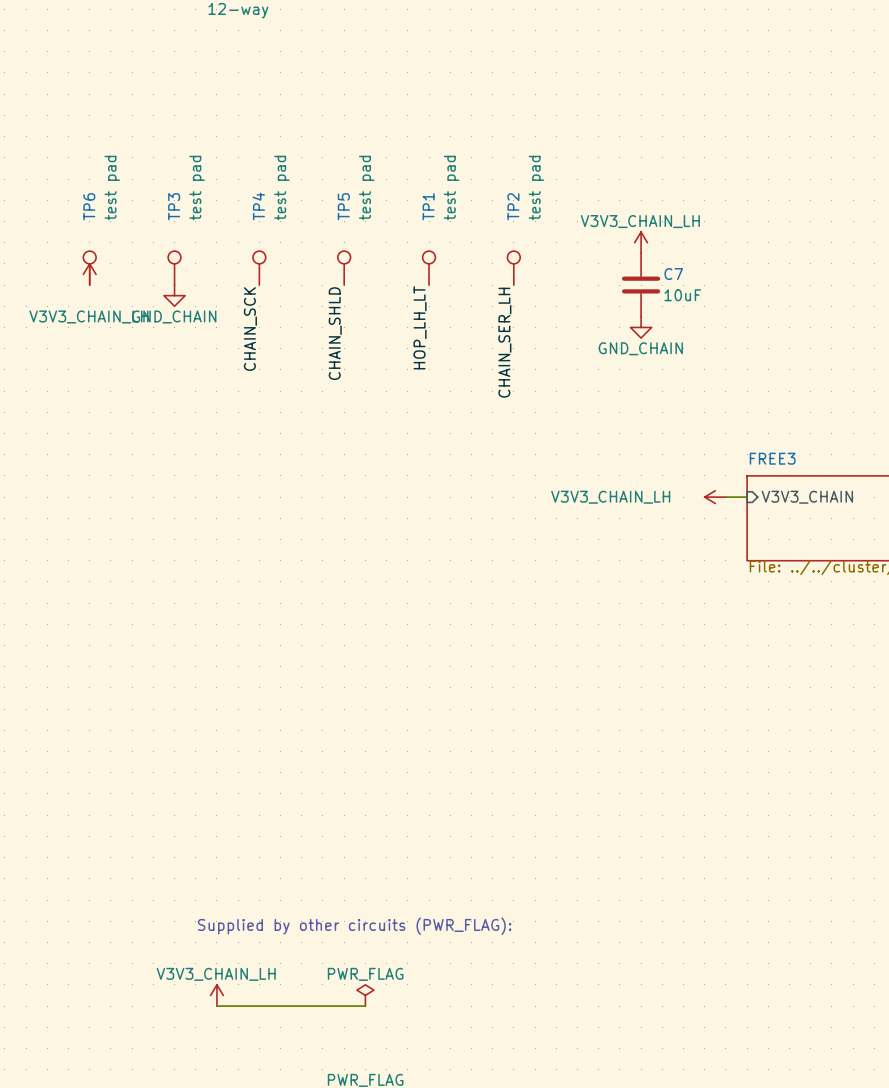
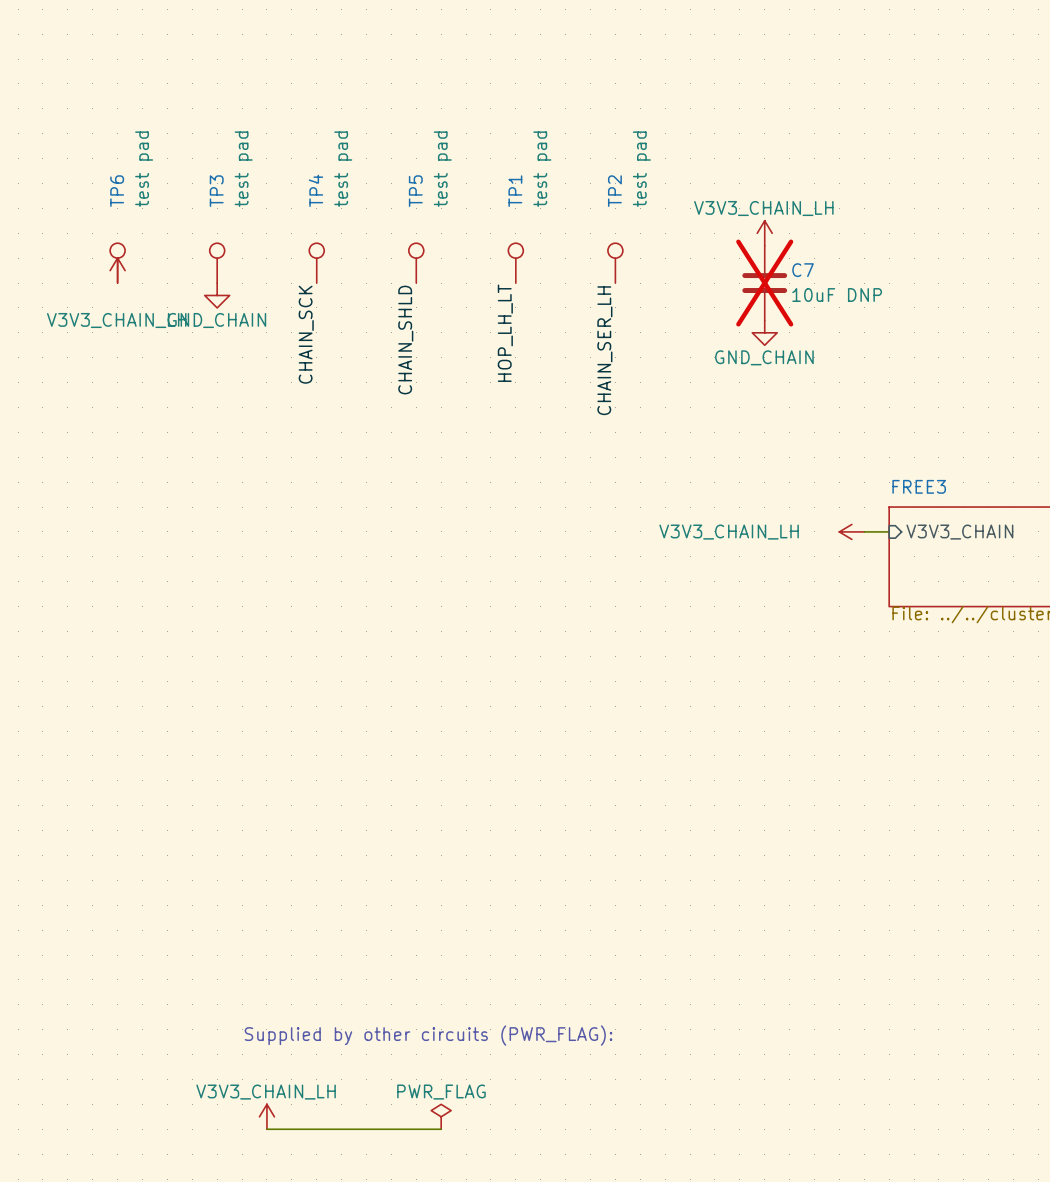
C7 do-not-place cross: none -> (764, 283)
C7 value: 10uF (682, 295) -> 10uF DNP (837, 295)

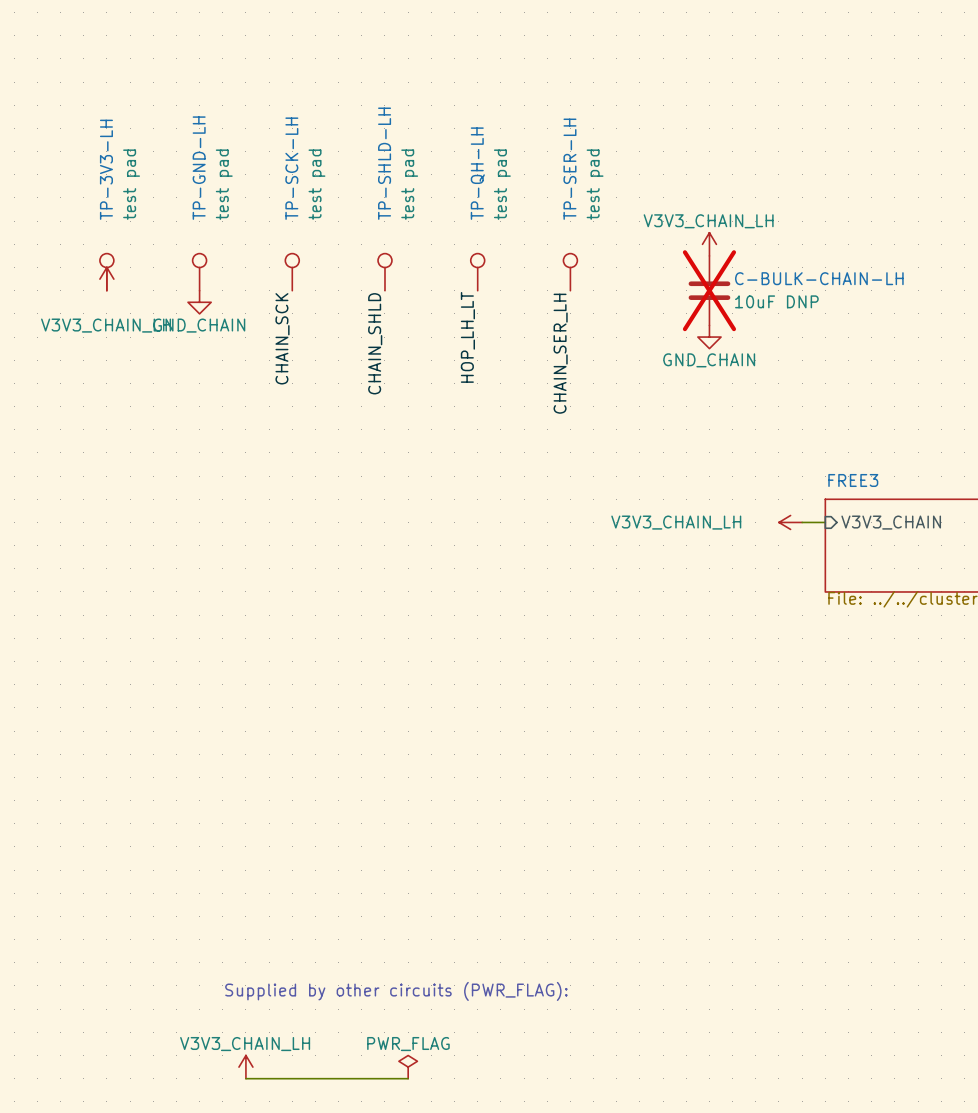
TP4 name: TP4 (315, 190) -> TP-SCK-LH (291, 168)
TP6 name: TP6 (117, 191) -> TP-3V3-LH (106, 169)
TP3 name: TP3 (216, 191) -> TP-GND-LH (199, 168)
TP5 name: TP5 (415, 191) -> TP-SHLD-LH (384, 163)
TP1 name: TP1 (515, 191) -> TP-QH-LH (477, 173)
TP2 name: TP2 (614, 191) -> TP-SER-LH (569, 169)
C7 name: C7 (803, 270) -> C-BULK-CHAIN-LH (819, 278)

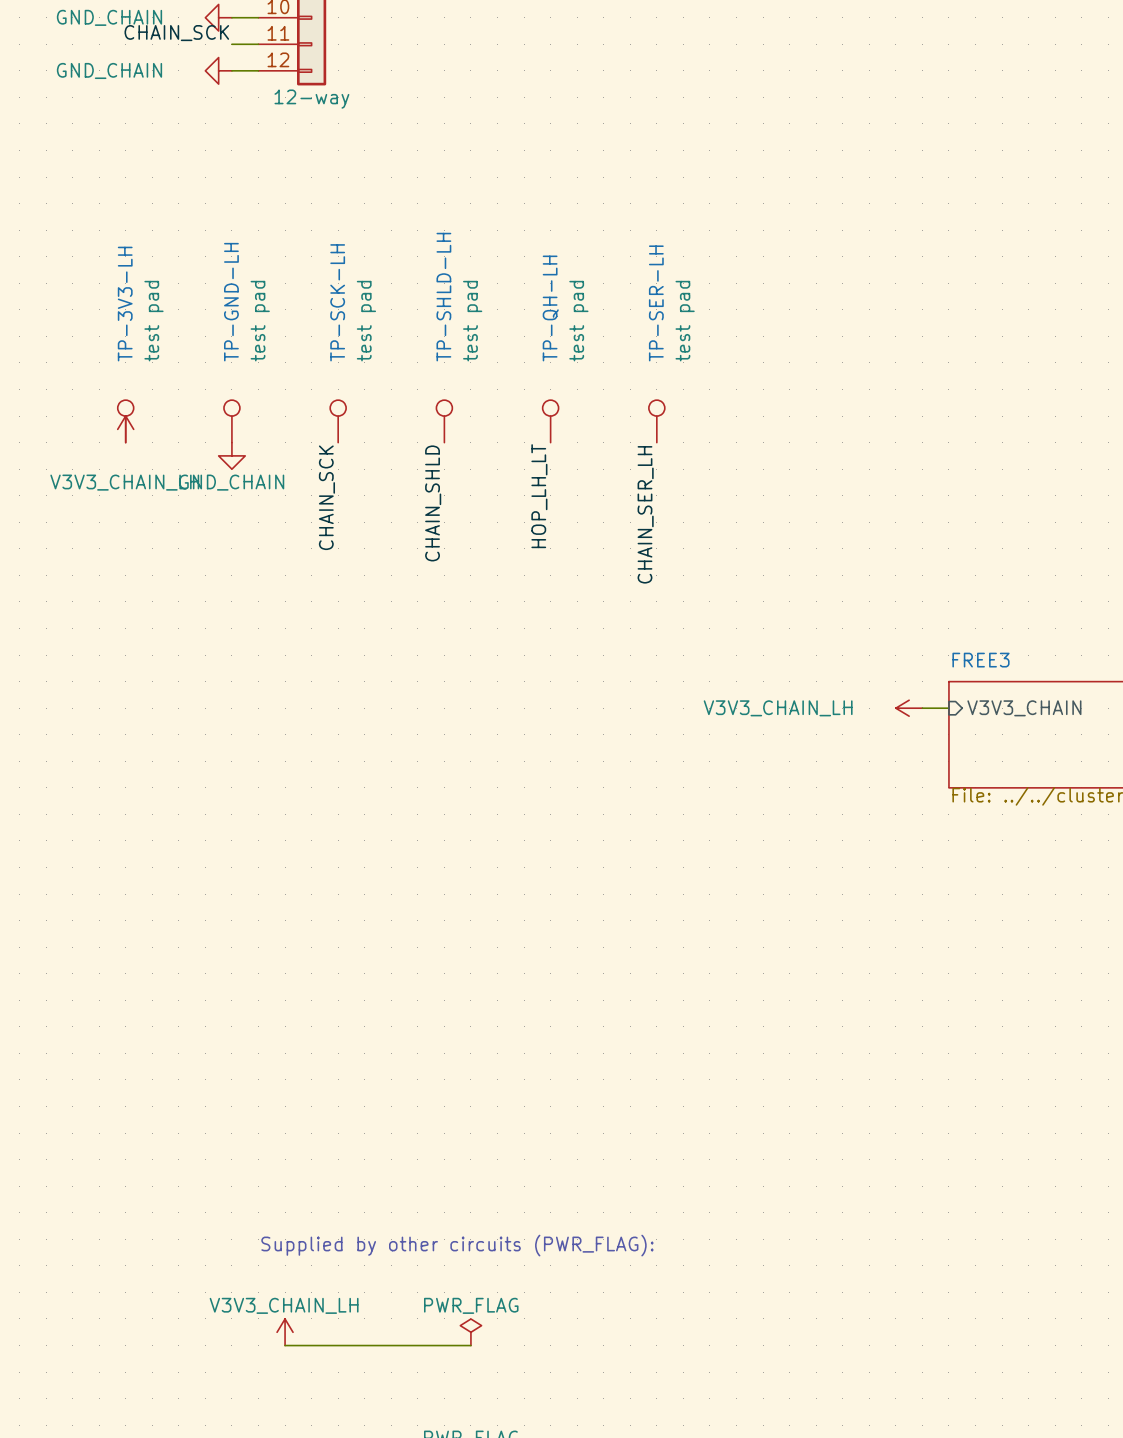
power symbol: V3V3_CHAIN_LH (709, 244) -> none
C-BULK-CHAIN-LH: 10uF DNP (709, 290) -> none
power symbol: GND_CHAIN (709, 337) -> none

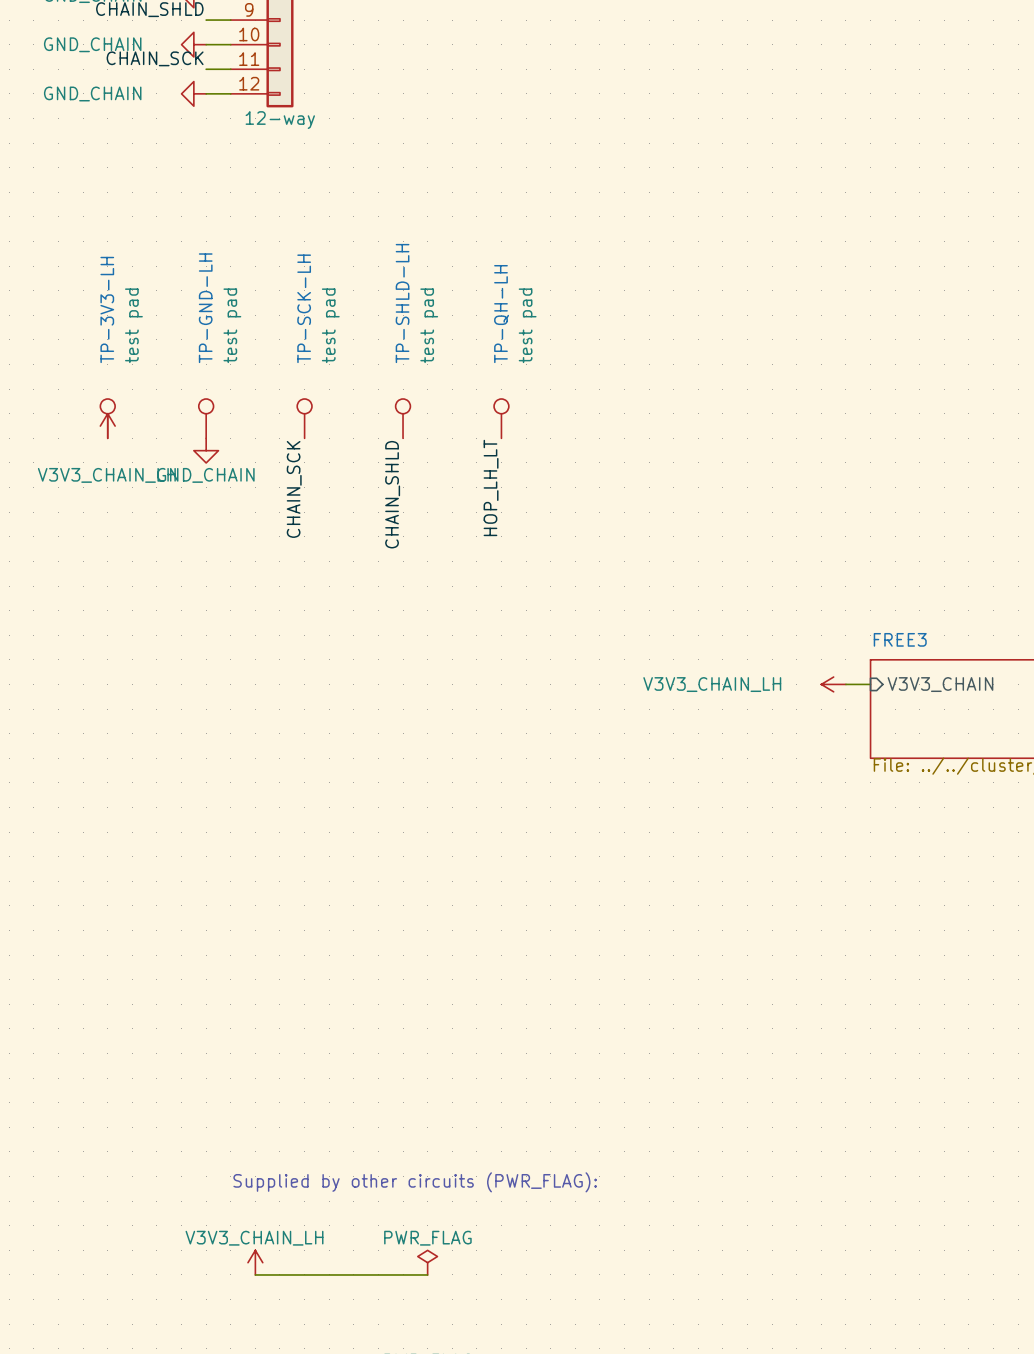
TP-SER-LH: test pad (656, 421) -> none
label: CHAIN_SER_LH (645, 514) -> none

